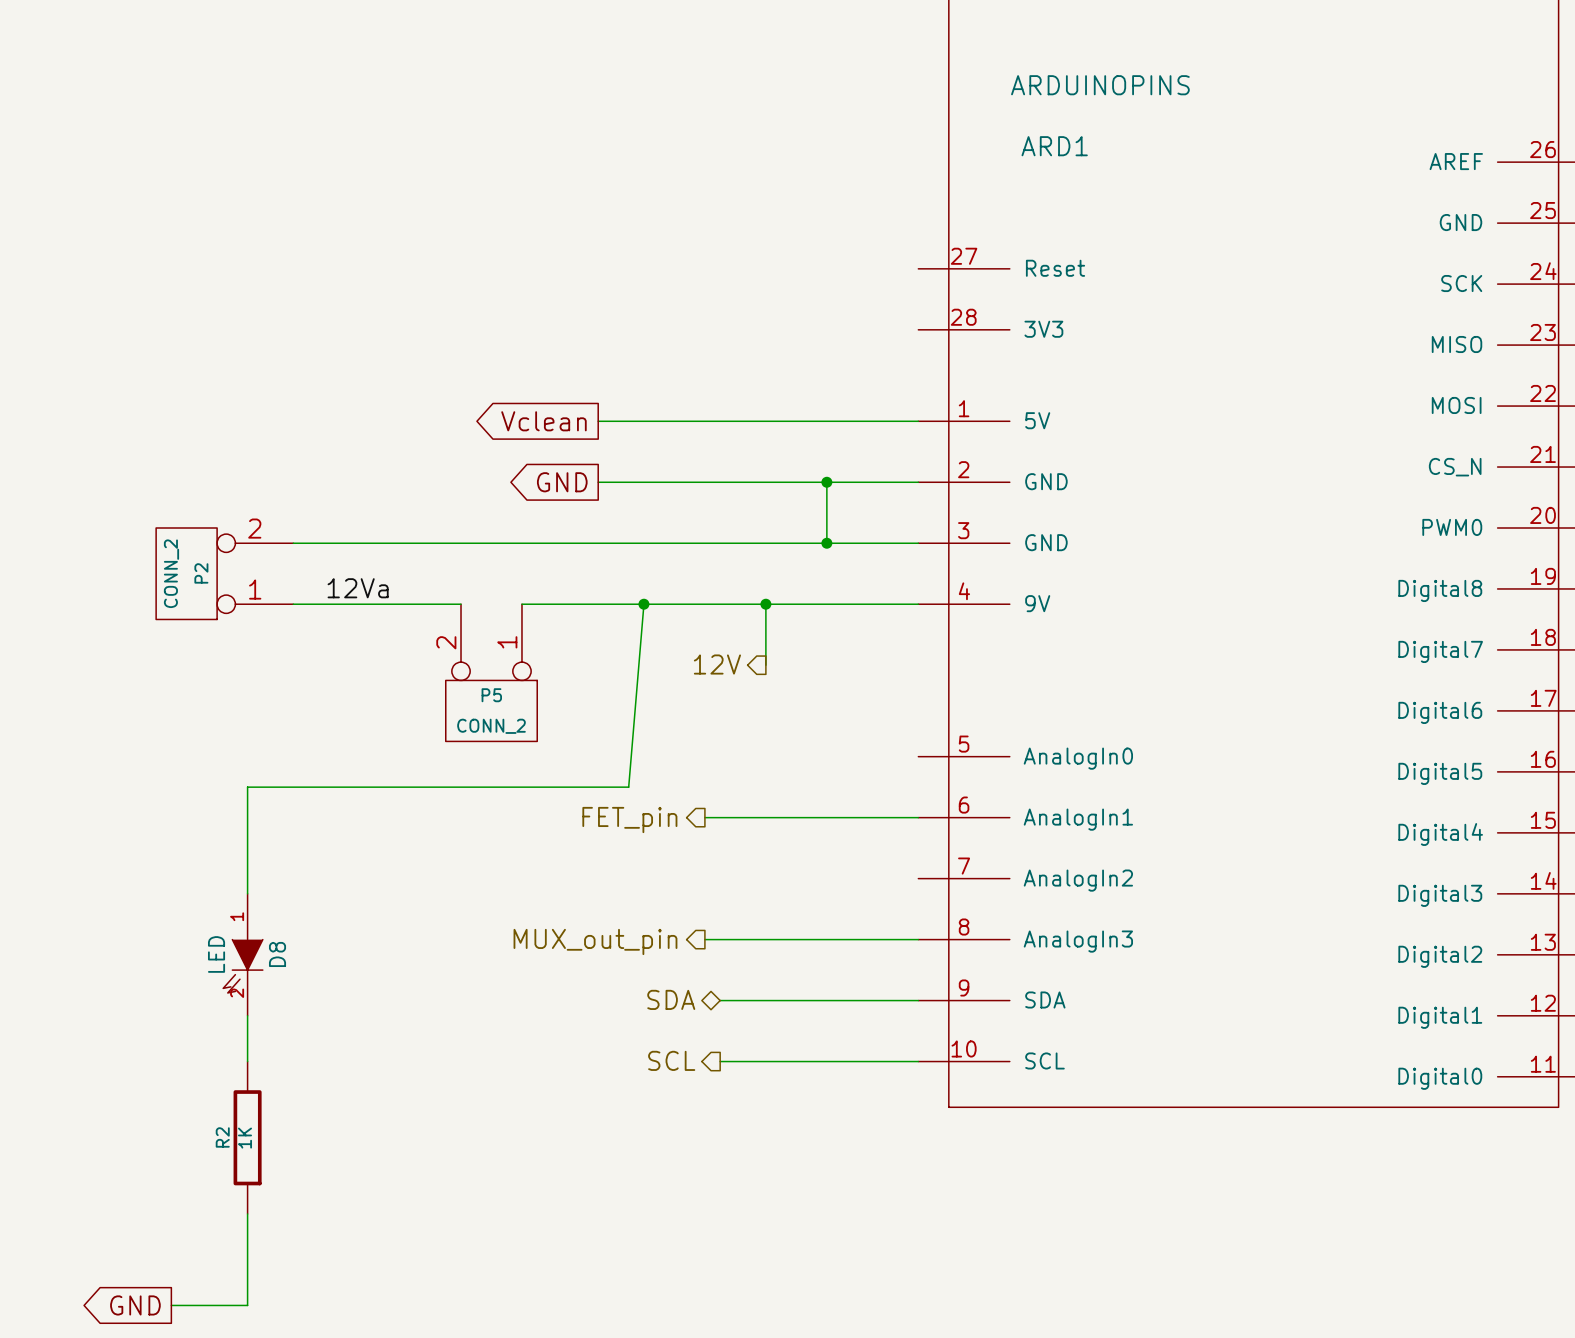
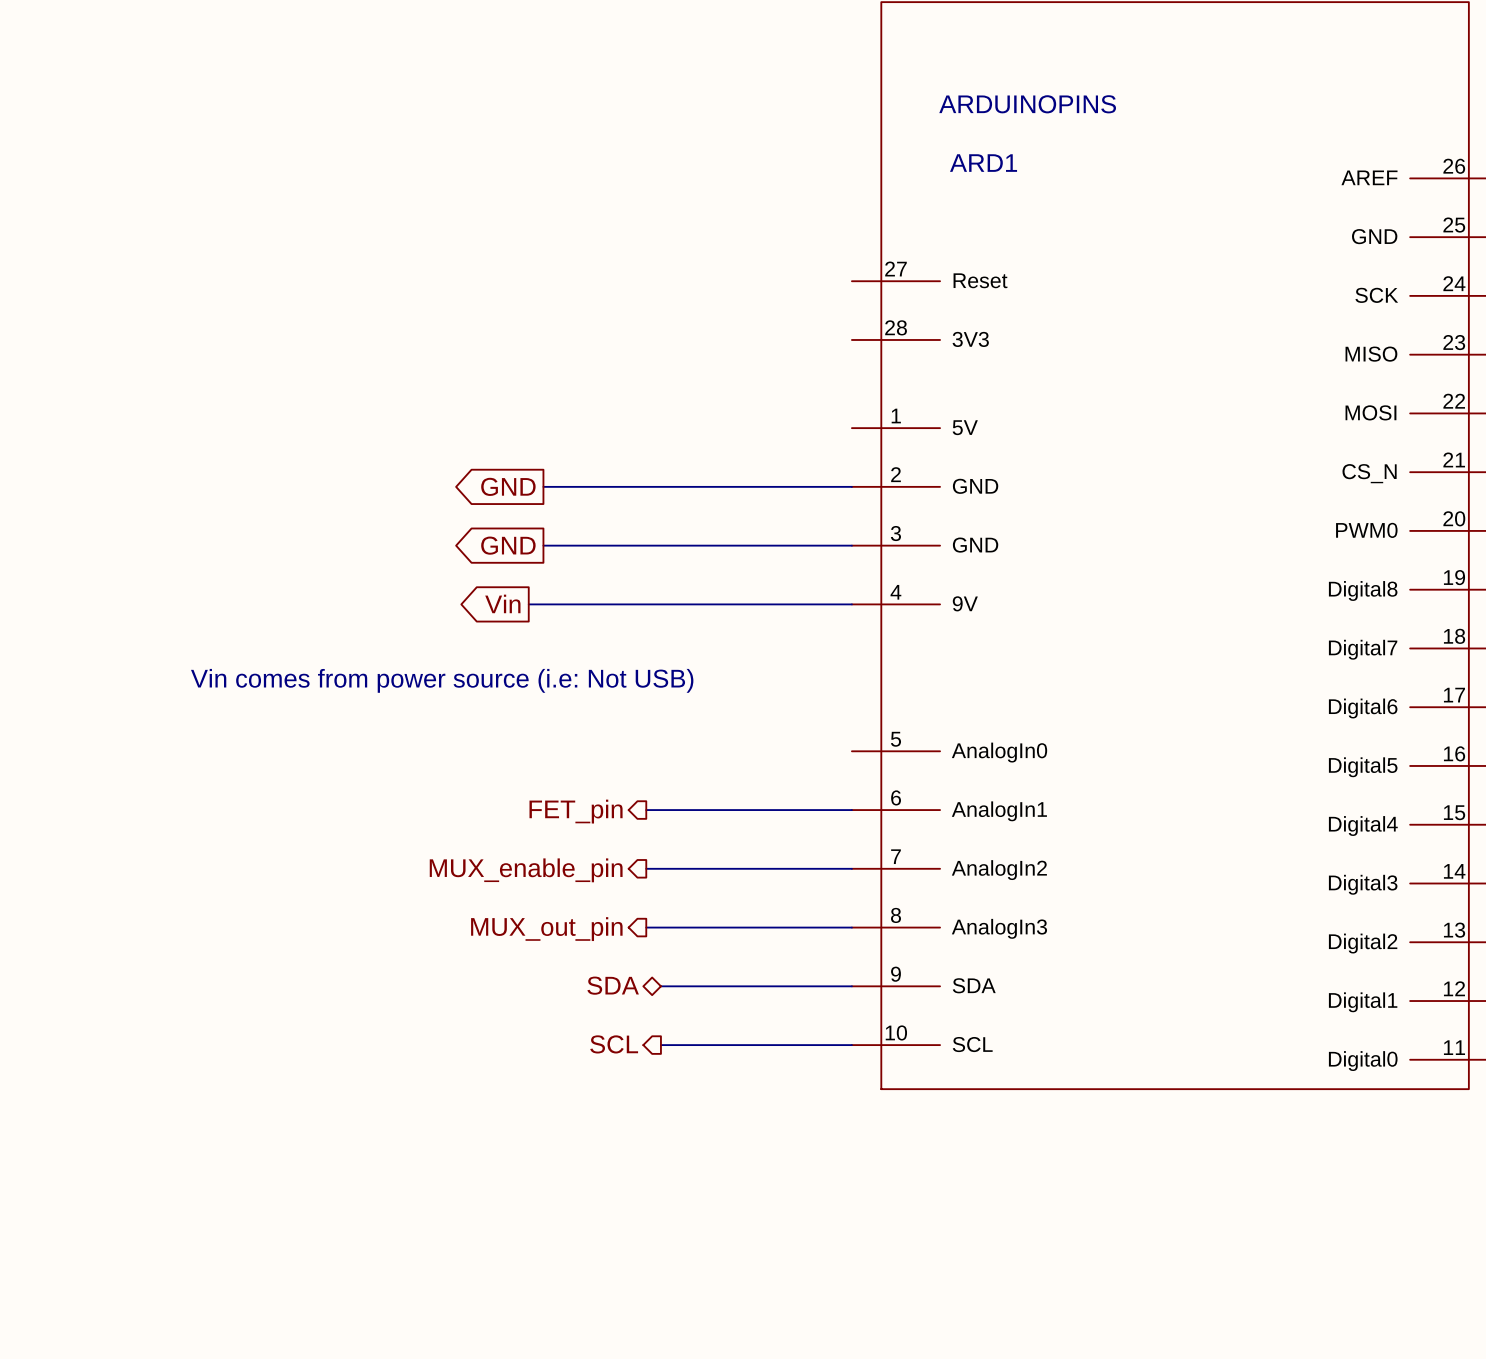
global label: Vclean (543, 421) -> none
wire: (598, 421) (918, 421) -> none
wire: (826, 482) (826, 543) -> none
junction: (826, 482) -> none
wire: (293, 543) (598, 543) -> none
global label: none -> GND (508, 545)
junction: (826, 543) -> none
P2: CONN_2 (224, 573) -> none
label: 12Va (358, 588) -> none
wire: (293, 604) (461, 604) -> none
wire: (521, 604) (582, 604) -> none
global label: none -> Vin (502, 603)
wire: (643, 604) (628, 787) (247, 787) (247, 893) -> none
junction: (643, 604) -> none
wire: (765, 604) (765, 665) -> none
junction: (765, 604) -> none
hierarchical label: 12V (717, 664) -> none
P5: CONN_2 (491, 672) -> none
text: none -> Vin comes from power source (i.e: Not USB) (442, 680)
wire: none -> (646, 868) (851, 868)
hierarchical label: none -> MUX_enable_pin (526, 870)
D8: LED (243, 954) -> none
wire: (247, 1015) (247, 1061) -> none
R2: 1K (247, 1137) -> none
wire: (247, 1213) (247, 1305) (171, 1305) -> none
global label: GND (135, 1305) -> none

